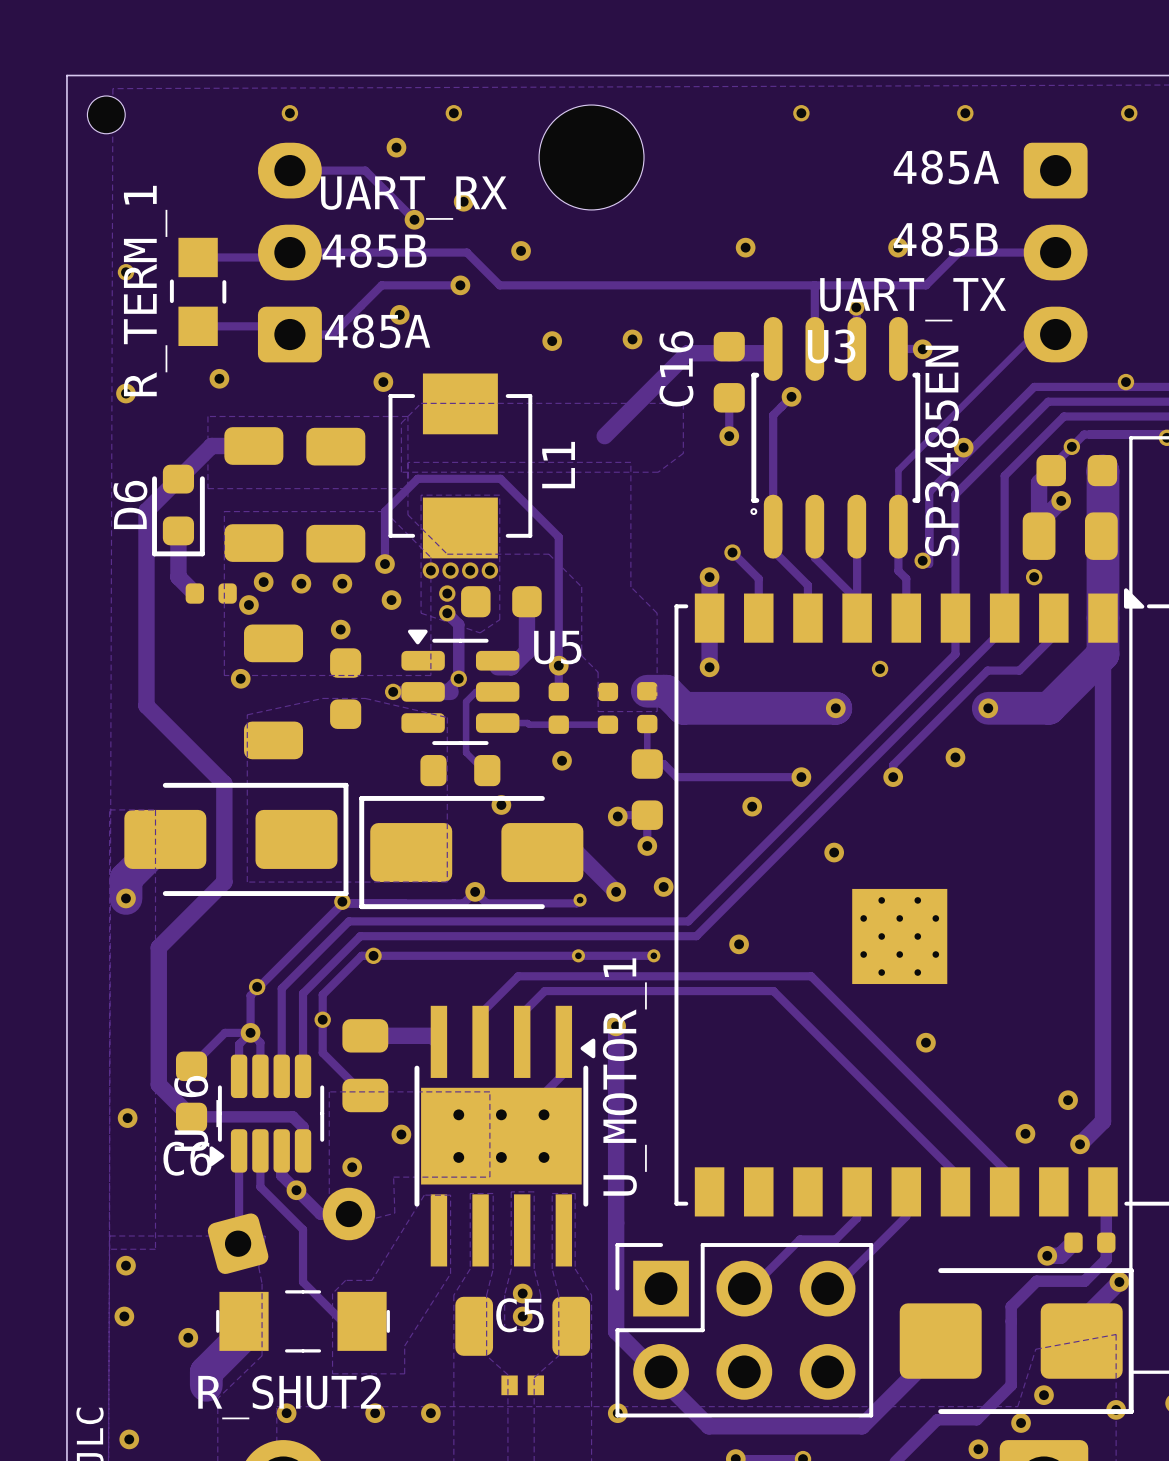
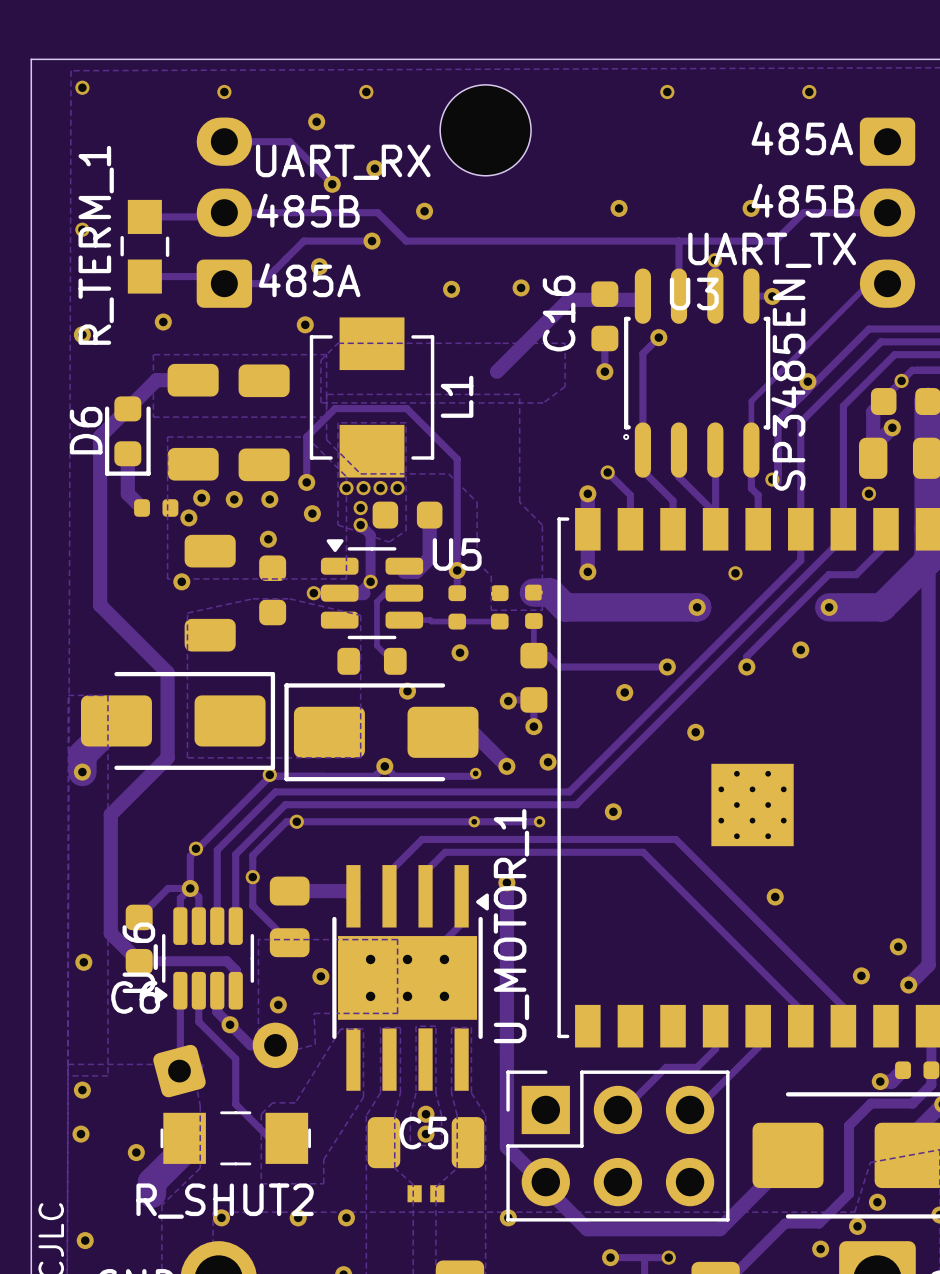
via: none -> (82, 87)
part: (106, 114) -> none

